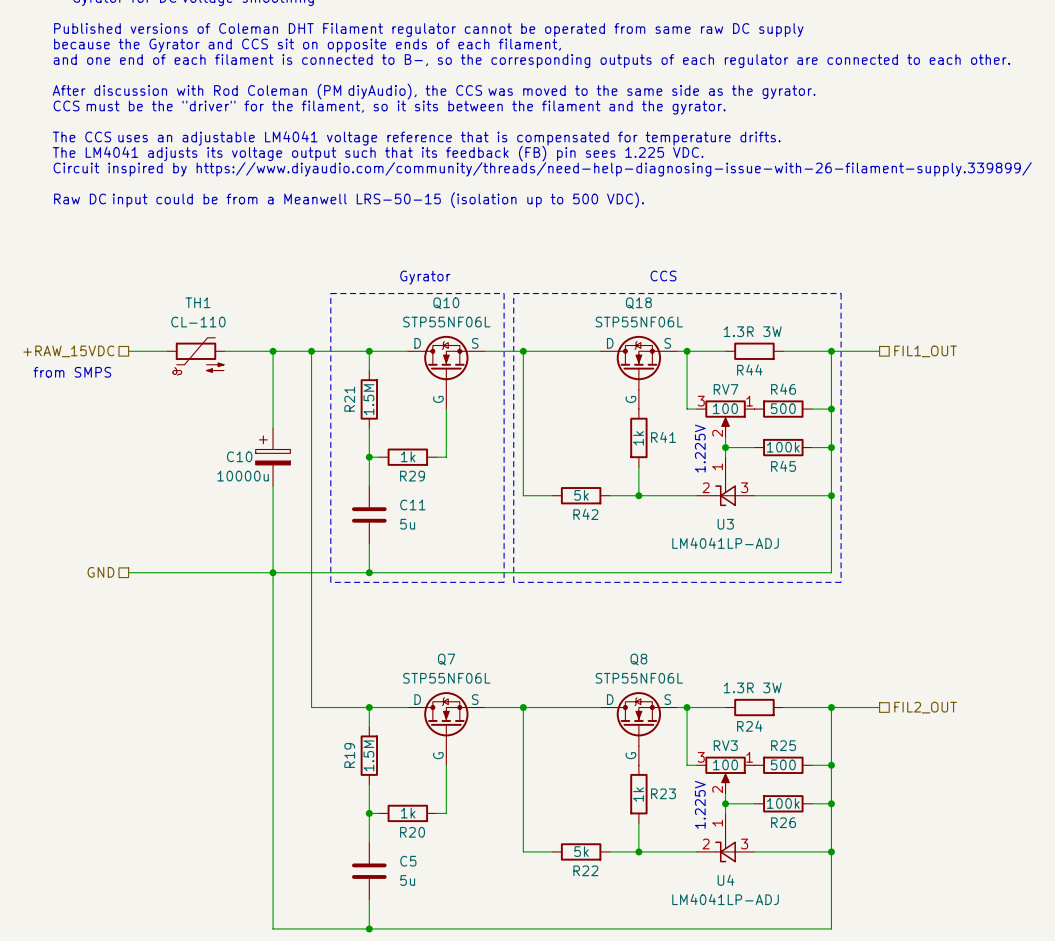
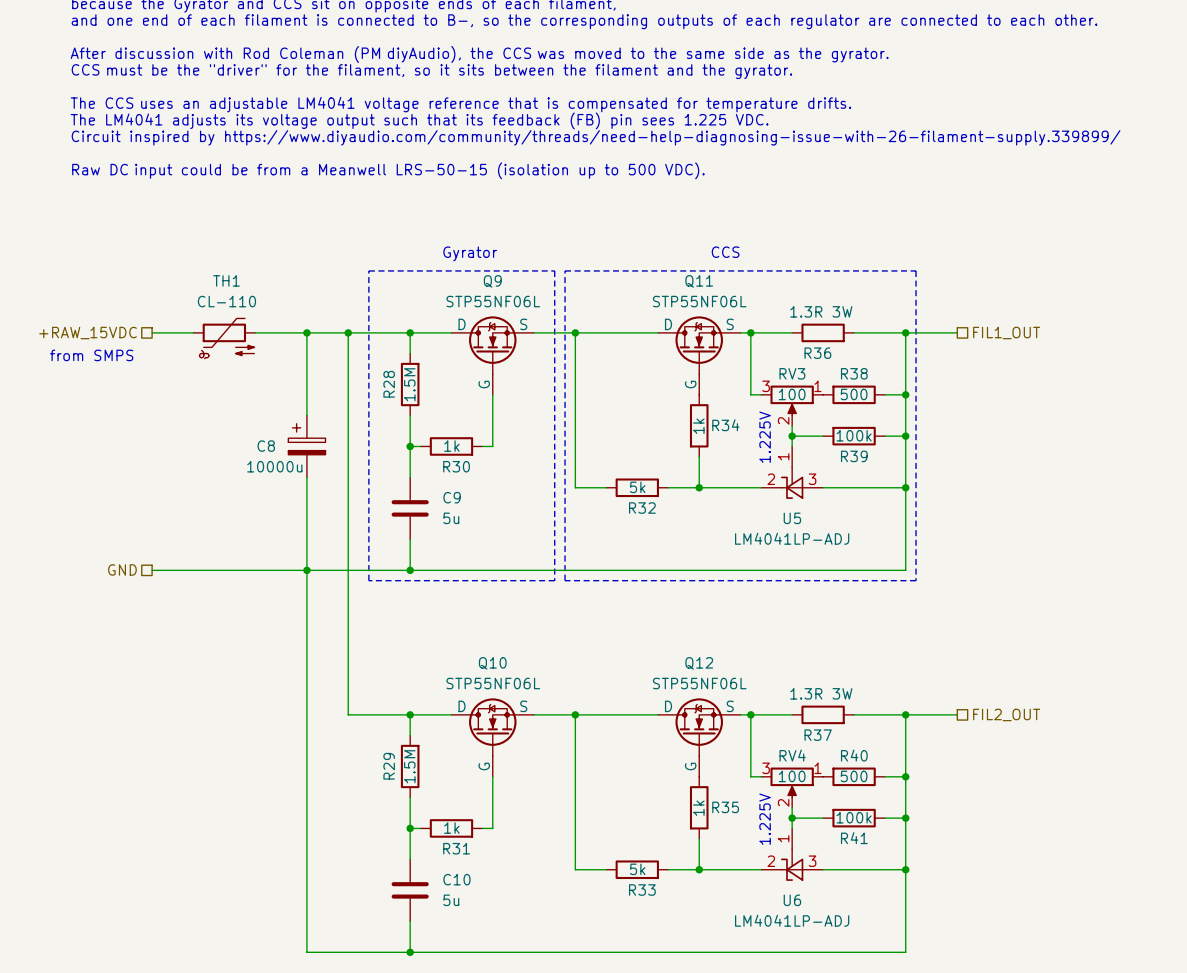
Q10 name: Q10 (446, 303) -> Q9 (492, 281)
Q18 name: Q18 (638, 303) -> Q11 (699, 281)
R44 name: R44 (749, 369) -> R36 (817, 353)
RV7 name: RV7 (726, 389) -> RV3 (792, 373)
R46 name: R46 (783, 389) -> R38 (854, 373)
R21 name: R21 (349, 399) -> R28 (389, 384)
R41 name: R41 (663, 437) -> R34 (725, 425)
C10 name: C10 (239, 456) -> C8 (266, 446)
R45 name: R45 (783, 466) -> R39 (854, 456)
R29 name: R29 (412, 476) -> R30 (456, 466)
C11 name: C11 (412, 504) -> C9 (452, 497)
R42 name: R42 (585, 514) -> R32 (642, 508)
U3 name: U3 (725, 524) -> U5 (792, 518)
Q7 name: Q7 (446, 659) -> Q10 (492, 663)
Q8 name: Q8 (638, 659) -> Q12 (699, 663)
R24 name: R24 (749, 726) -> R37 (818, 735)
RV3 name: RV3 (725, 745) -> RV4 (792, 755)
R25 name: R25 (783, 745) -> R40 (854, 755)
R19 name: R19 (349, 755) -> R29 (389, 766)
R23 name: R23 (663, 793) -> R35 (725, 807)
R26 name: R26 (783, 822) -> R41 (854, 838)
R20 name: R20 (412, 832) -> R31 (456, 848)
C5 name: C5 (408, 861) -> C10 (456, 879)
R22 name: R22 (585, 870) -> R33 (642, 889)
U4 name: U4 (726, 880) -> U6 (792, 900)

